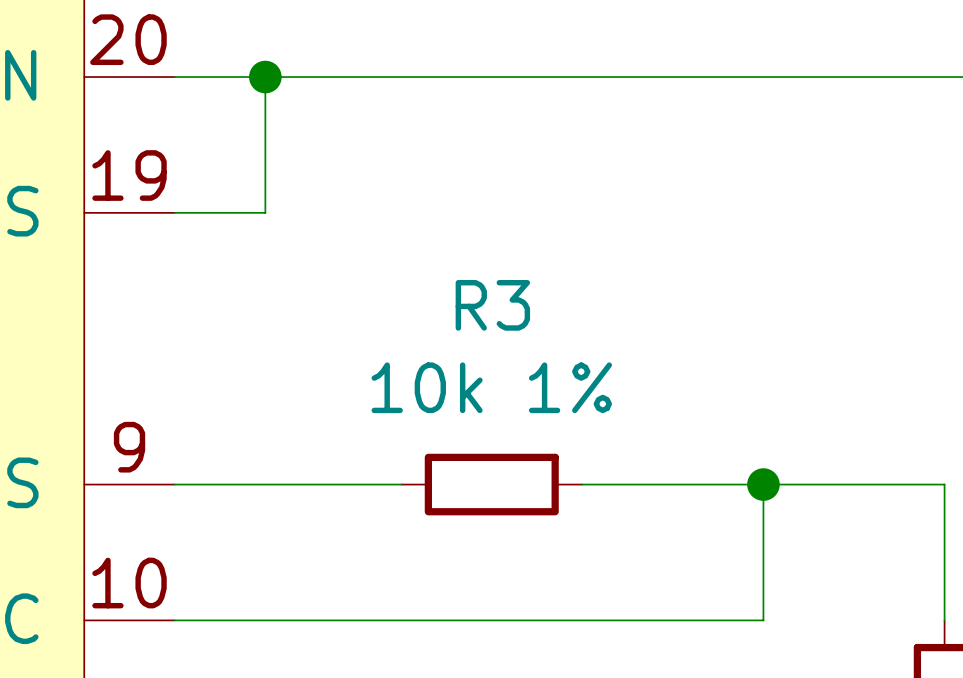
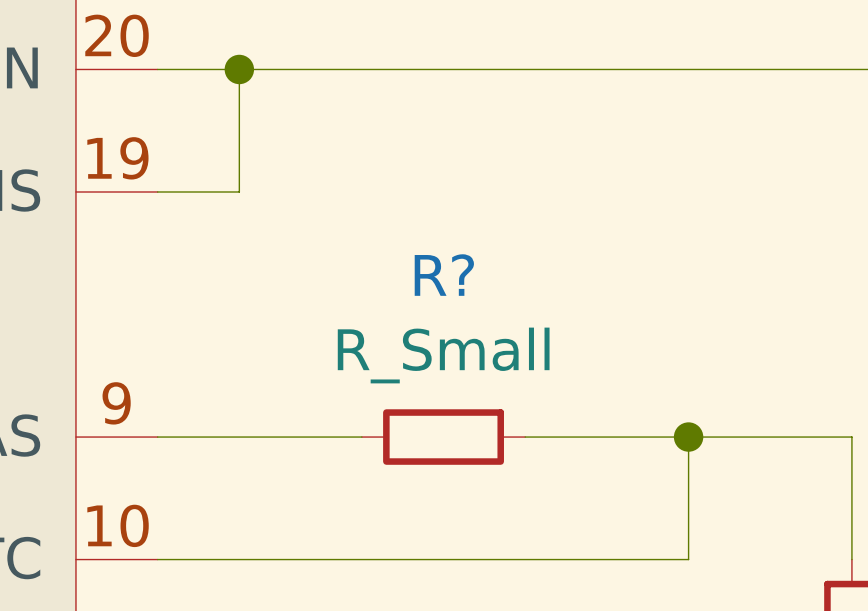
R3 name: R3 (492, 305) -> R? (444, 275)
R3 value: 10k 1% (491, 387) -> R_Small (443, 355)

